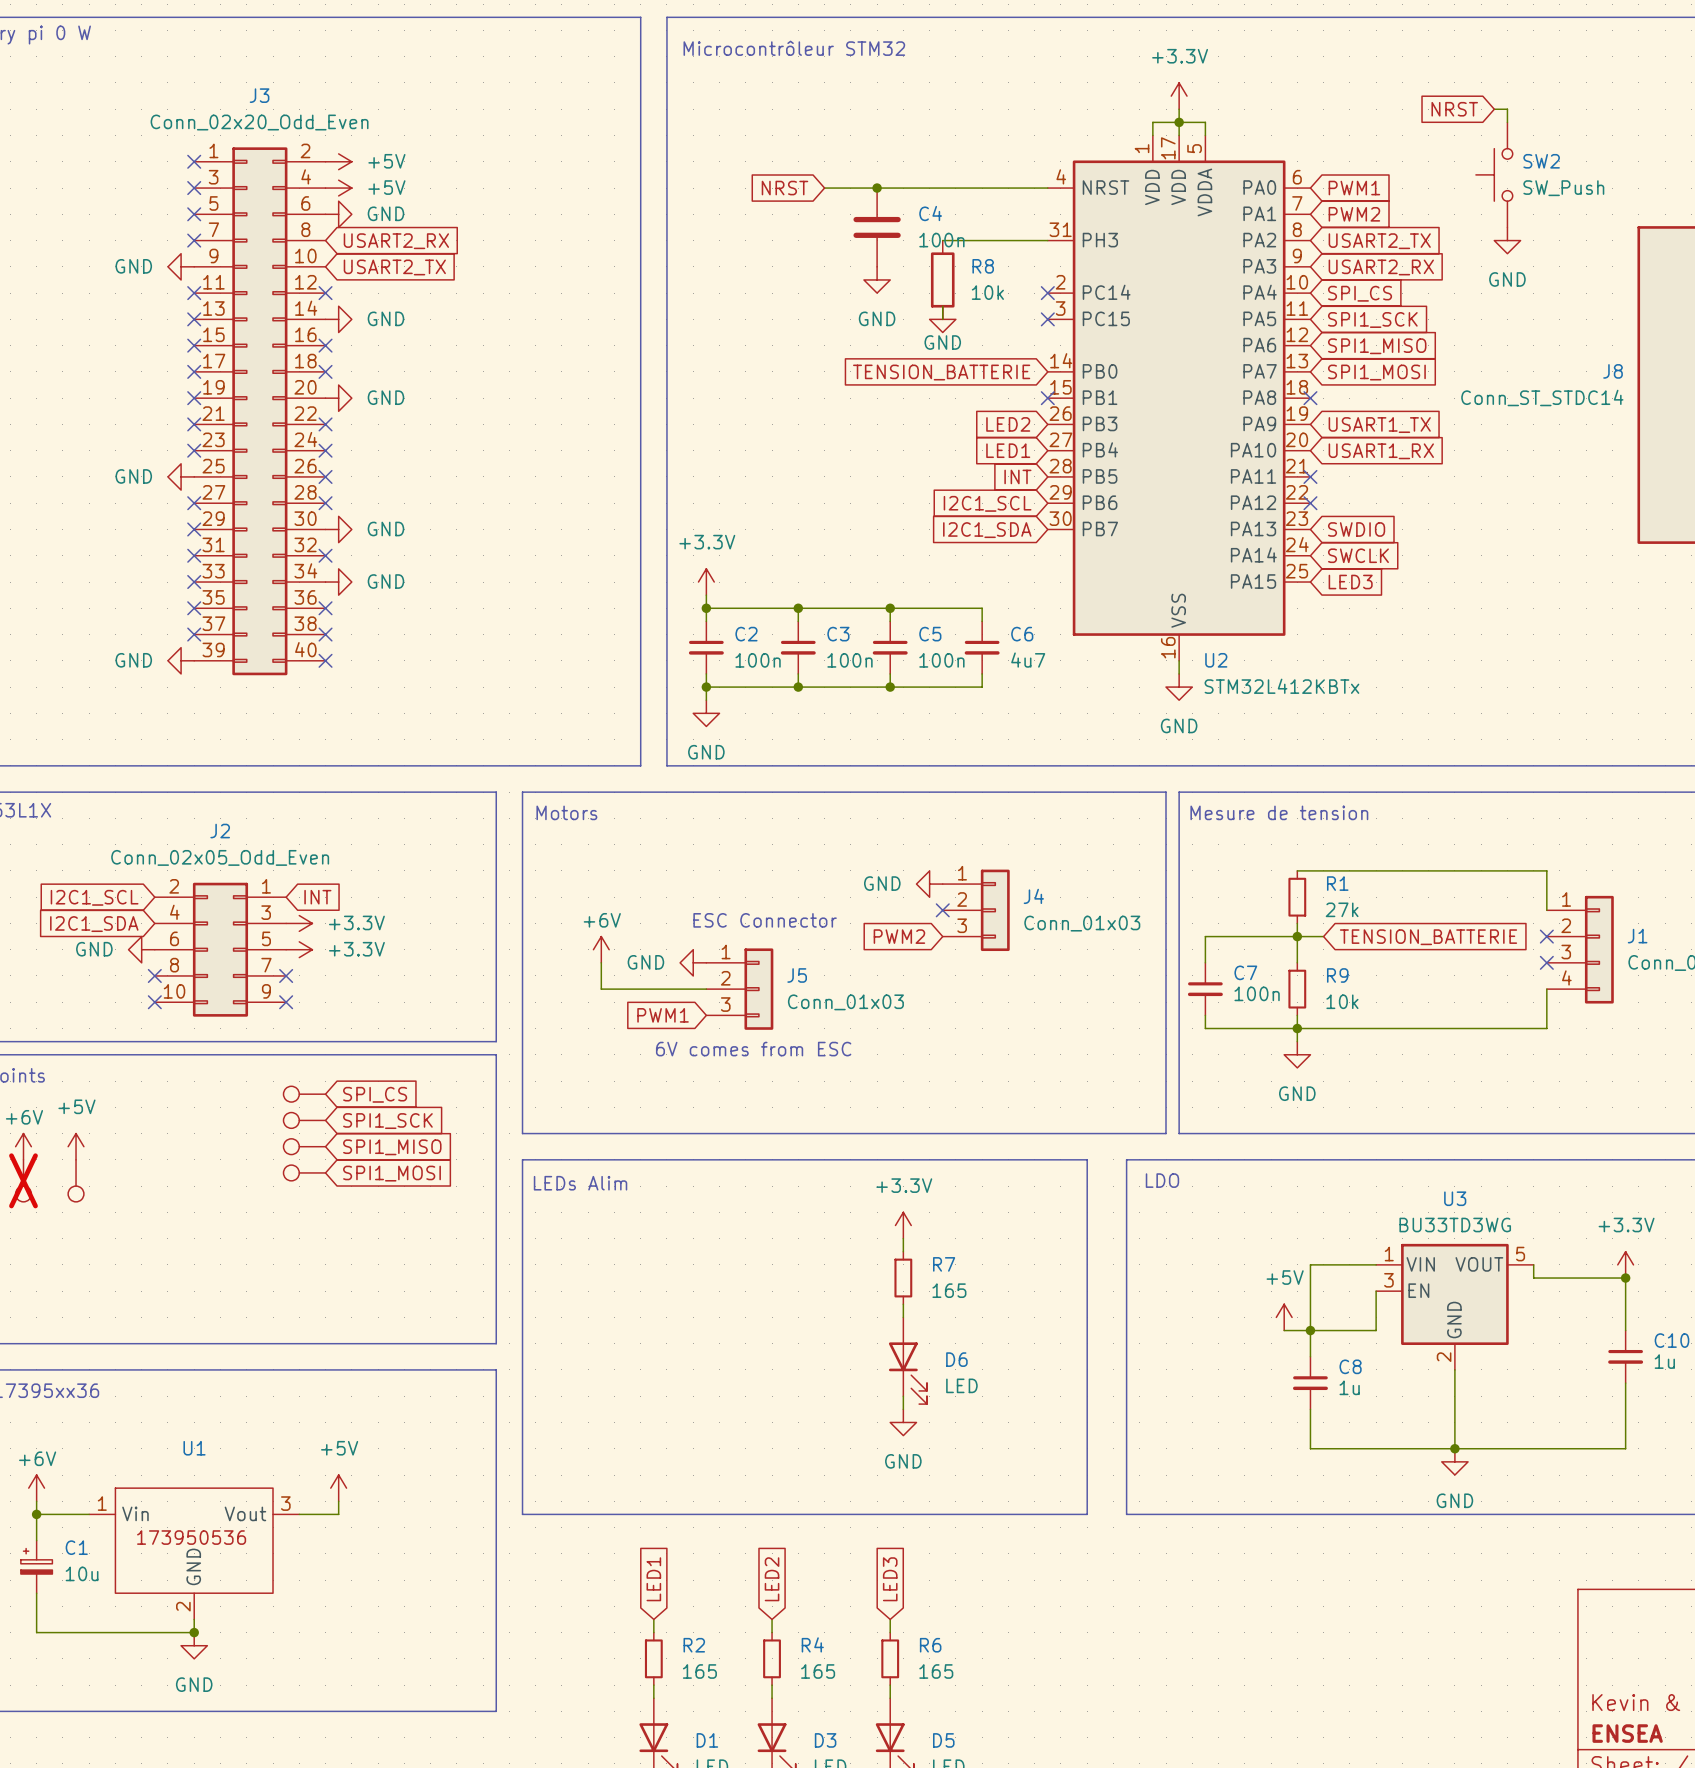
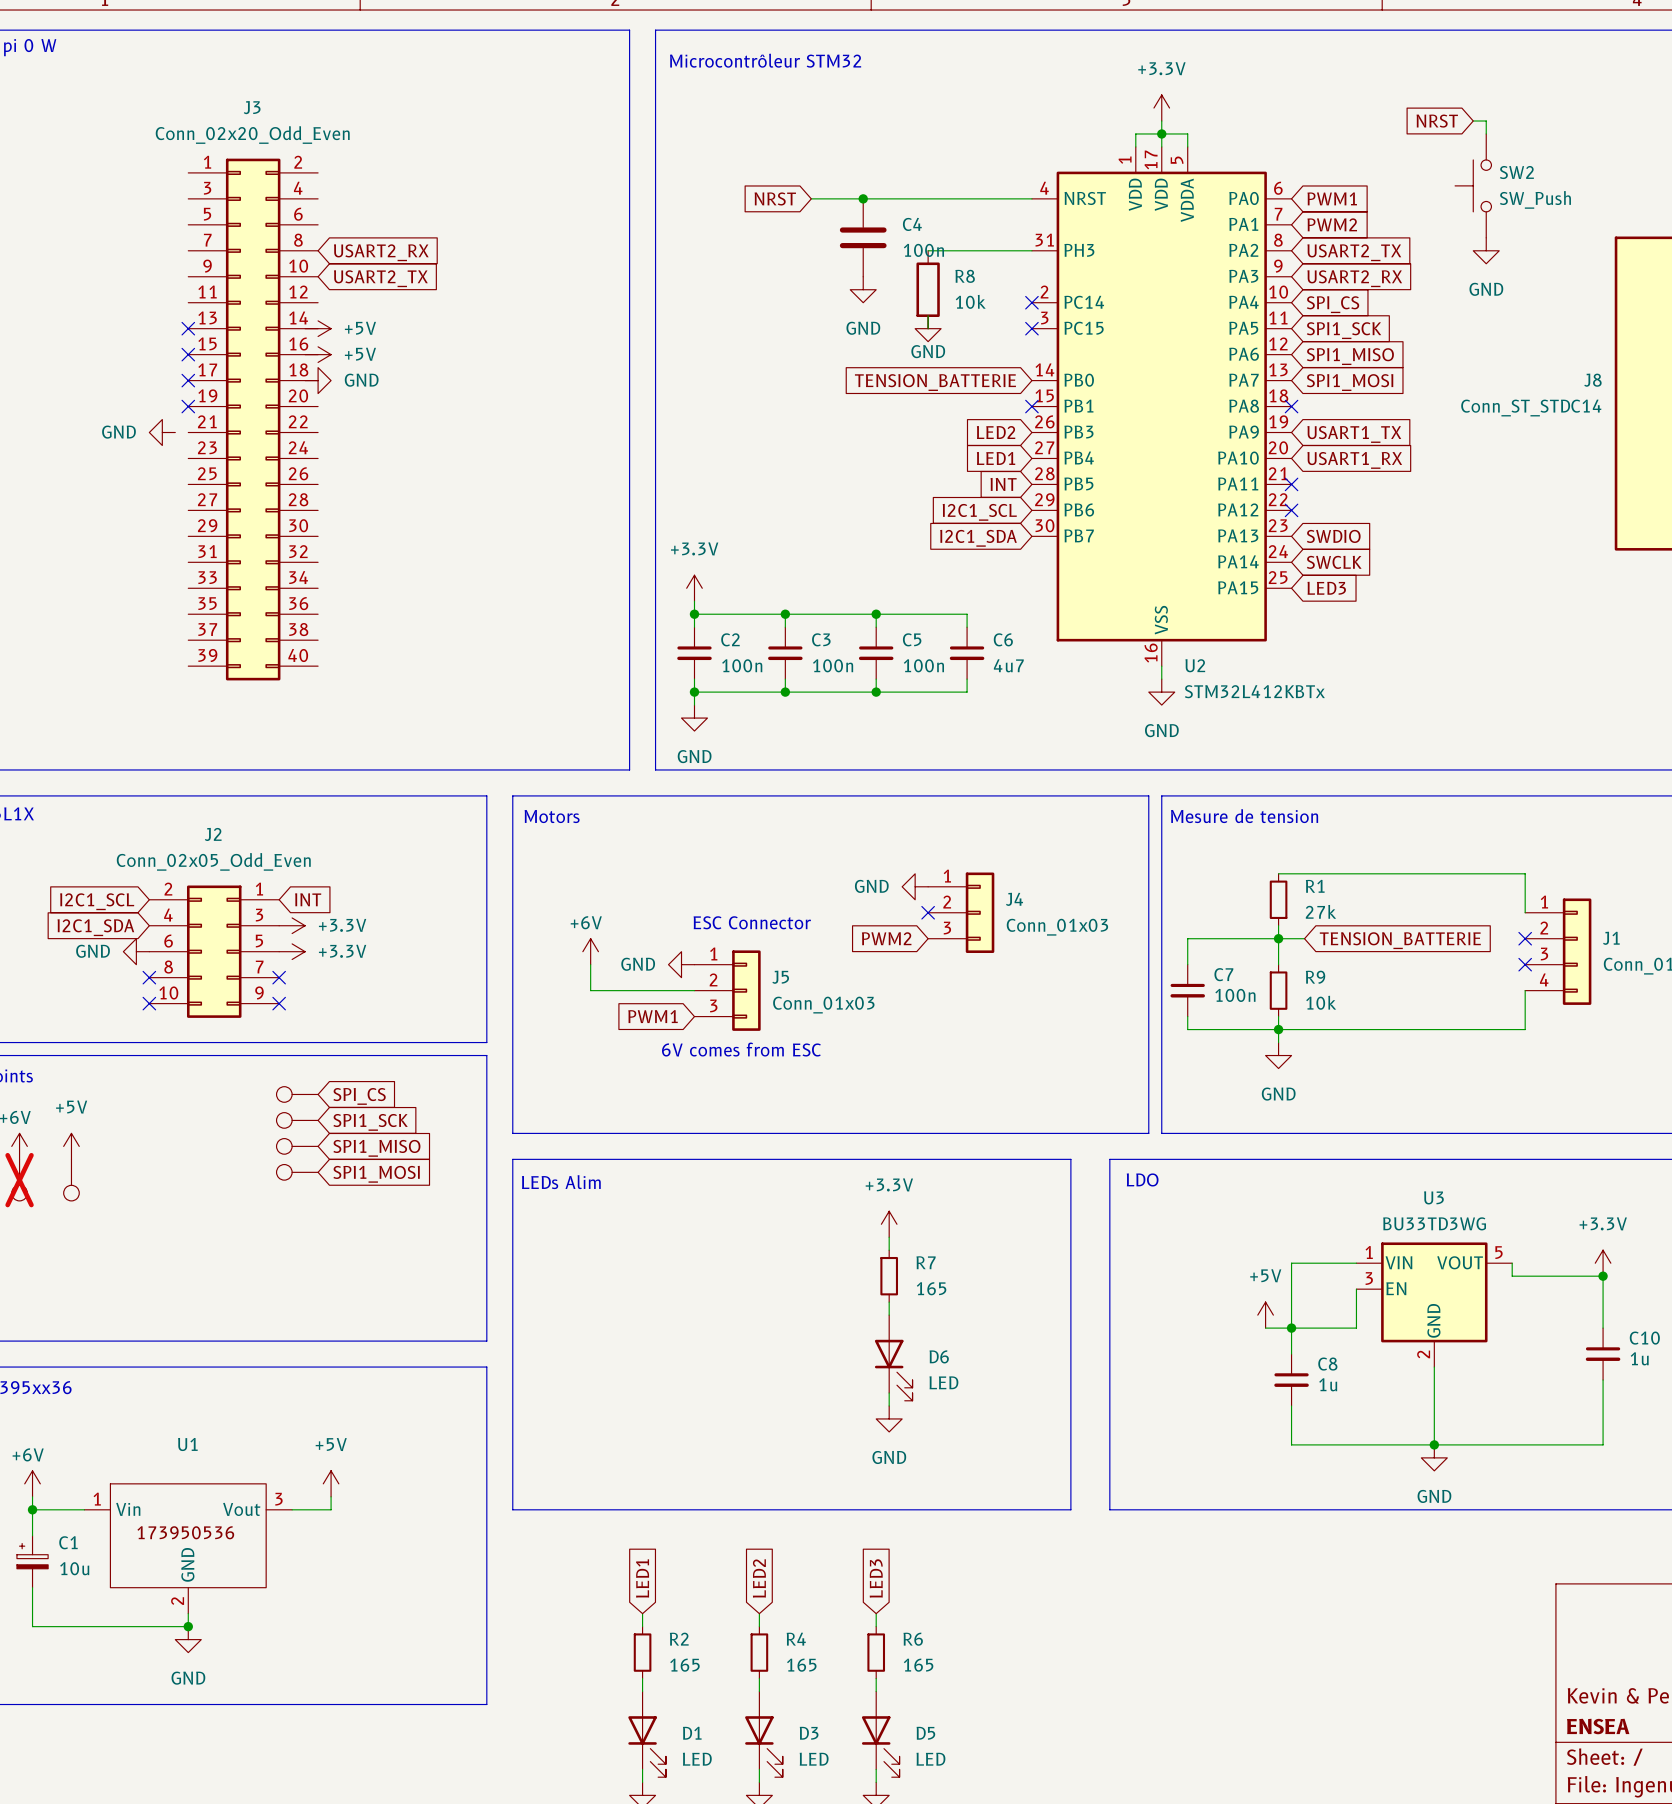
no-connect mark: (194, 161) -> none
power symbol: +5V (338, 161) -> none
no-connect mark: (194, 188) -> none
power symbol: +5V (338, 188) -> none
no-connect mark: (194, 214) -> none
power symbol: GND (338, 214) -> none
no-connect mark: (194, 240) -> none
power symbol: GND (181, 266) -> none
no-connect mark: (194, 293) -> none
no-connect mark: (325, 293) -> none
power symbol: none -> +5V (318, 328)
power symbol: GND (338, 319) -> none
no-connect mark: (325, 345) -> none
power symbol: none -> +5V (318, 354)
no-connect mark: (325, 371) -> none
power symbol: none -> GND (318, 380)
power symbol: GND (338, 398) -> none
no-connect mark: (194, 424) -> none
no-connect mark: (325, 424) -> none
no-connect mark: (194, 450) -> none
no-connect mark: (325, 450) -> none
power symbol position: GND (181, 476) -> GND (162, 432)
no-connect mark: (325, 476) -> none
no-connect mark: (194, 503) -> none
no-connect mark: (325, 503) -> none
no-connect mark: (194, 529) -> none
power symbol: GND (338, 529) -> none
no-connect mark: (194, 555) -> none
no-connect mark: (325, 555) -> none
no-connect mark: (194, 582) -> none
power symbol: GND (338, 582) -> none
no-connect mark: (194, 608) -> none
no-connect mark: (325, 608) -> none
no-connect mark: (194, 634) -> none
no-connect mark: (325, 634) -> none
power symbol: GND (181, 660) -> none
no-connect mark: (325, 660) -> none

